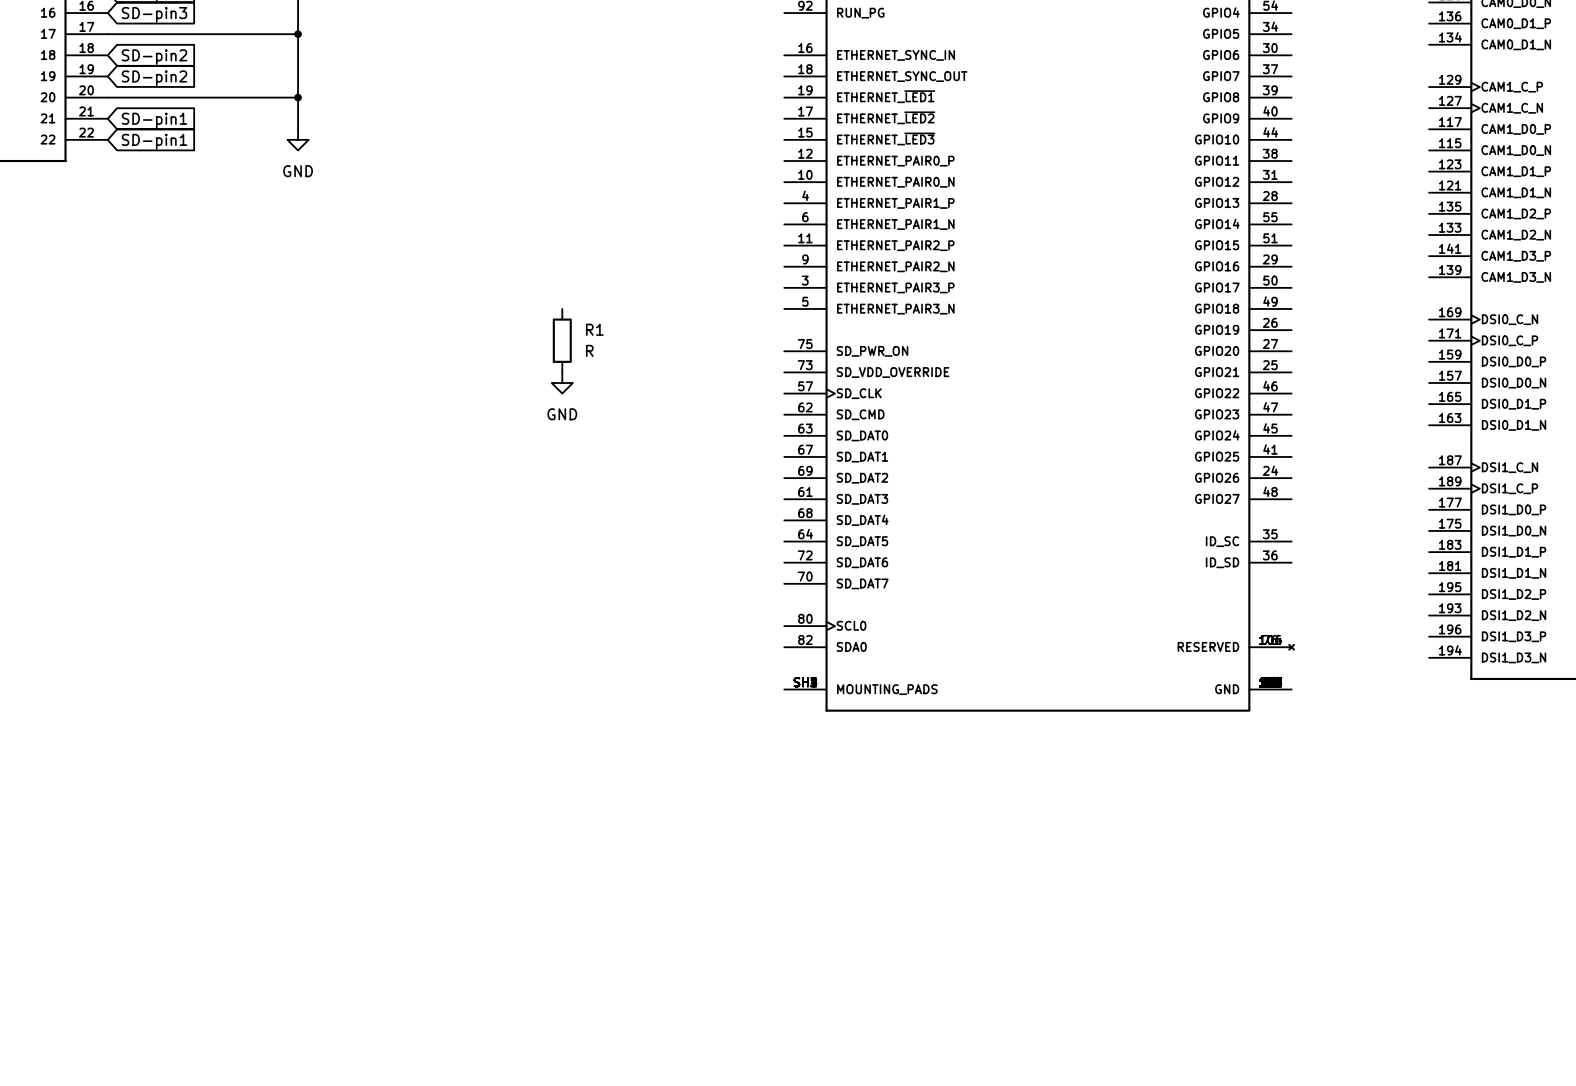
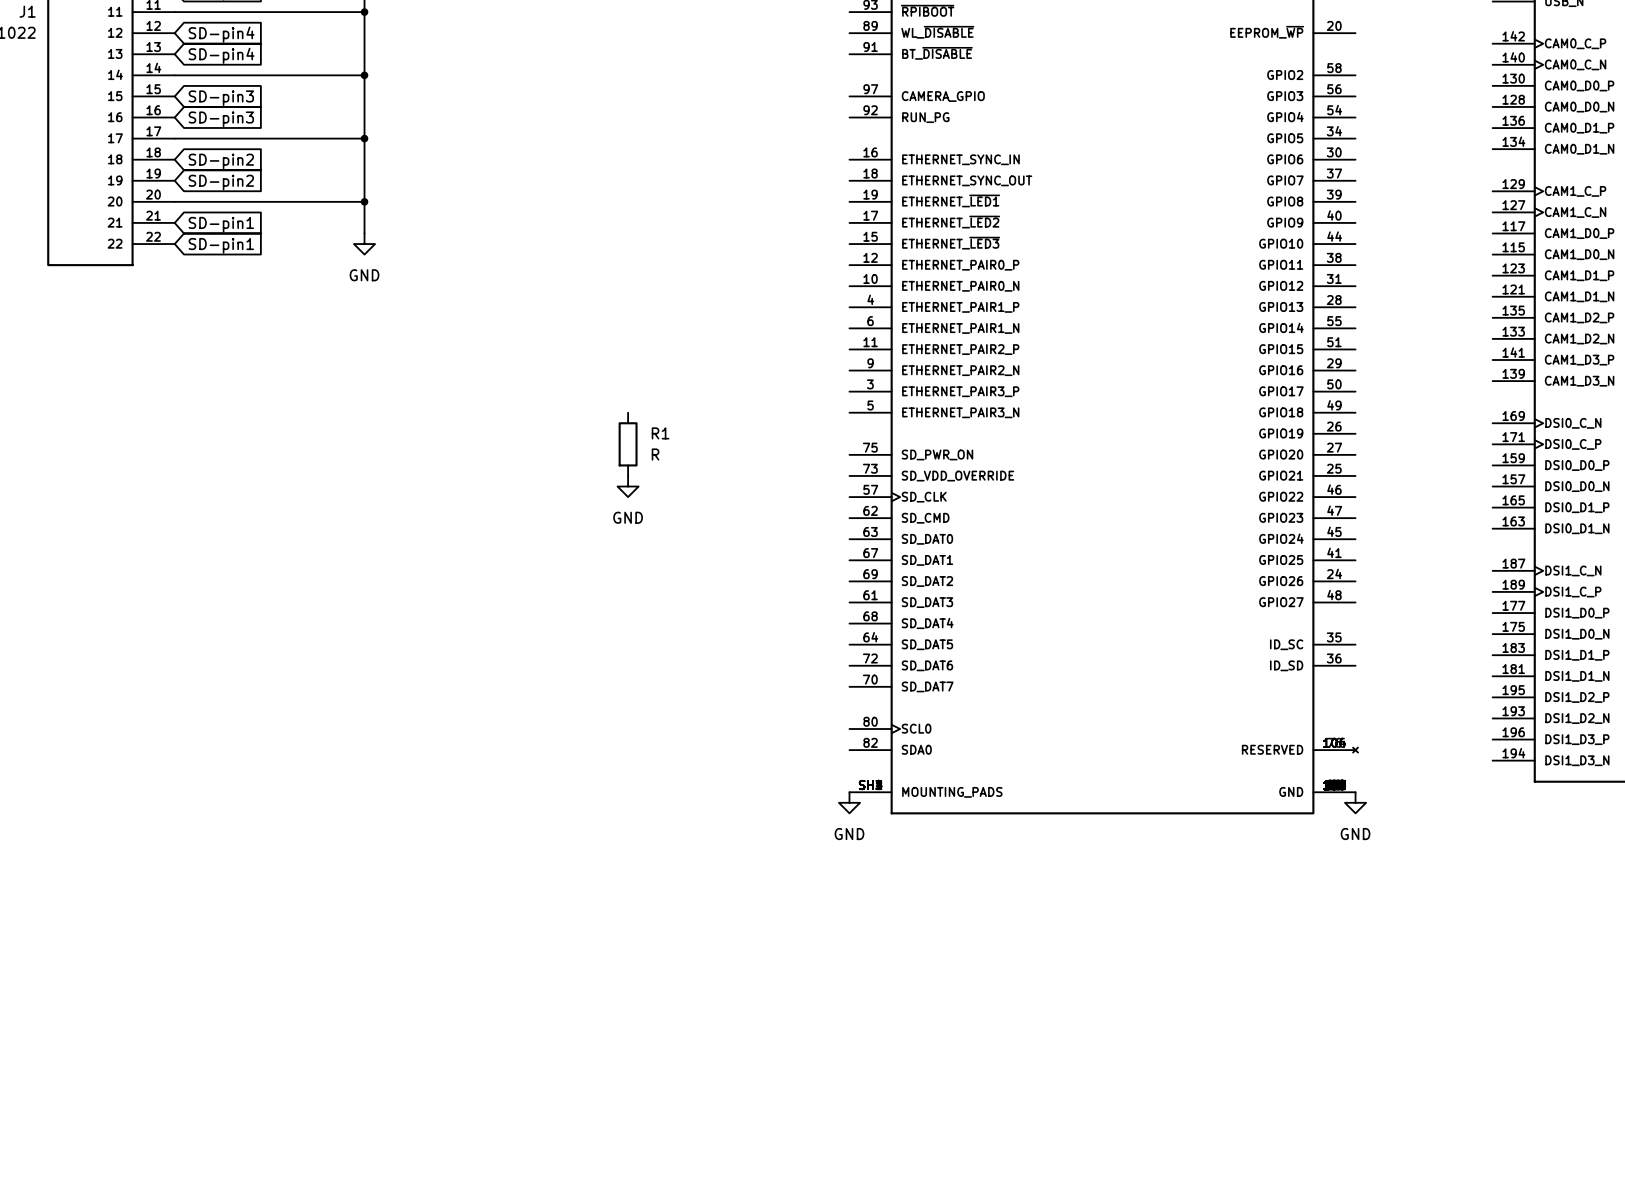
power symbol: none -> GND (849, 802)
power symbol: none -> GND (1355, 802)

